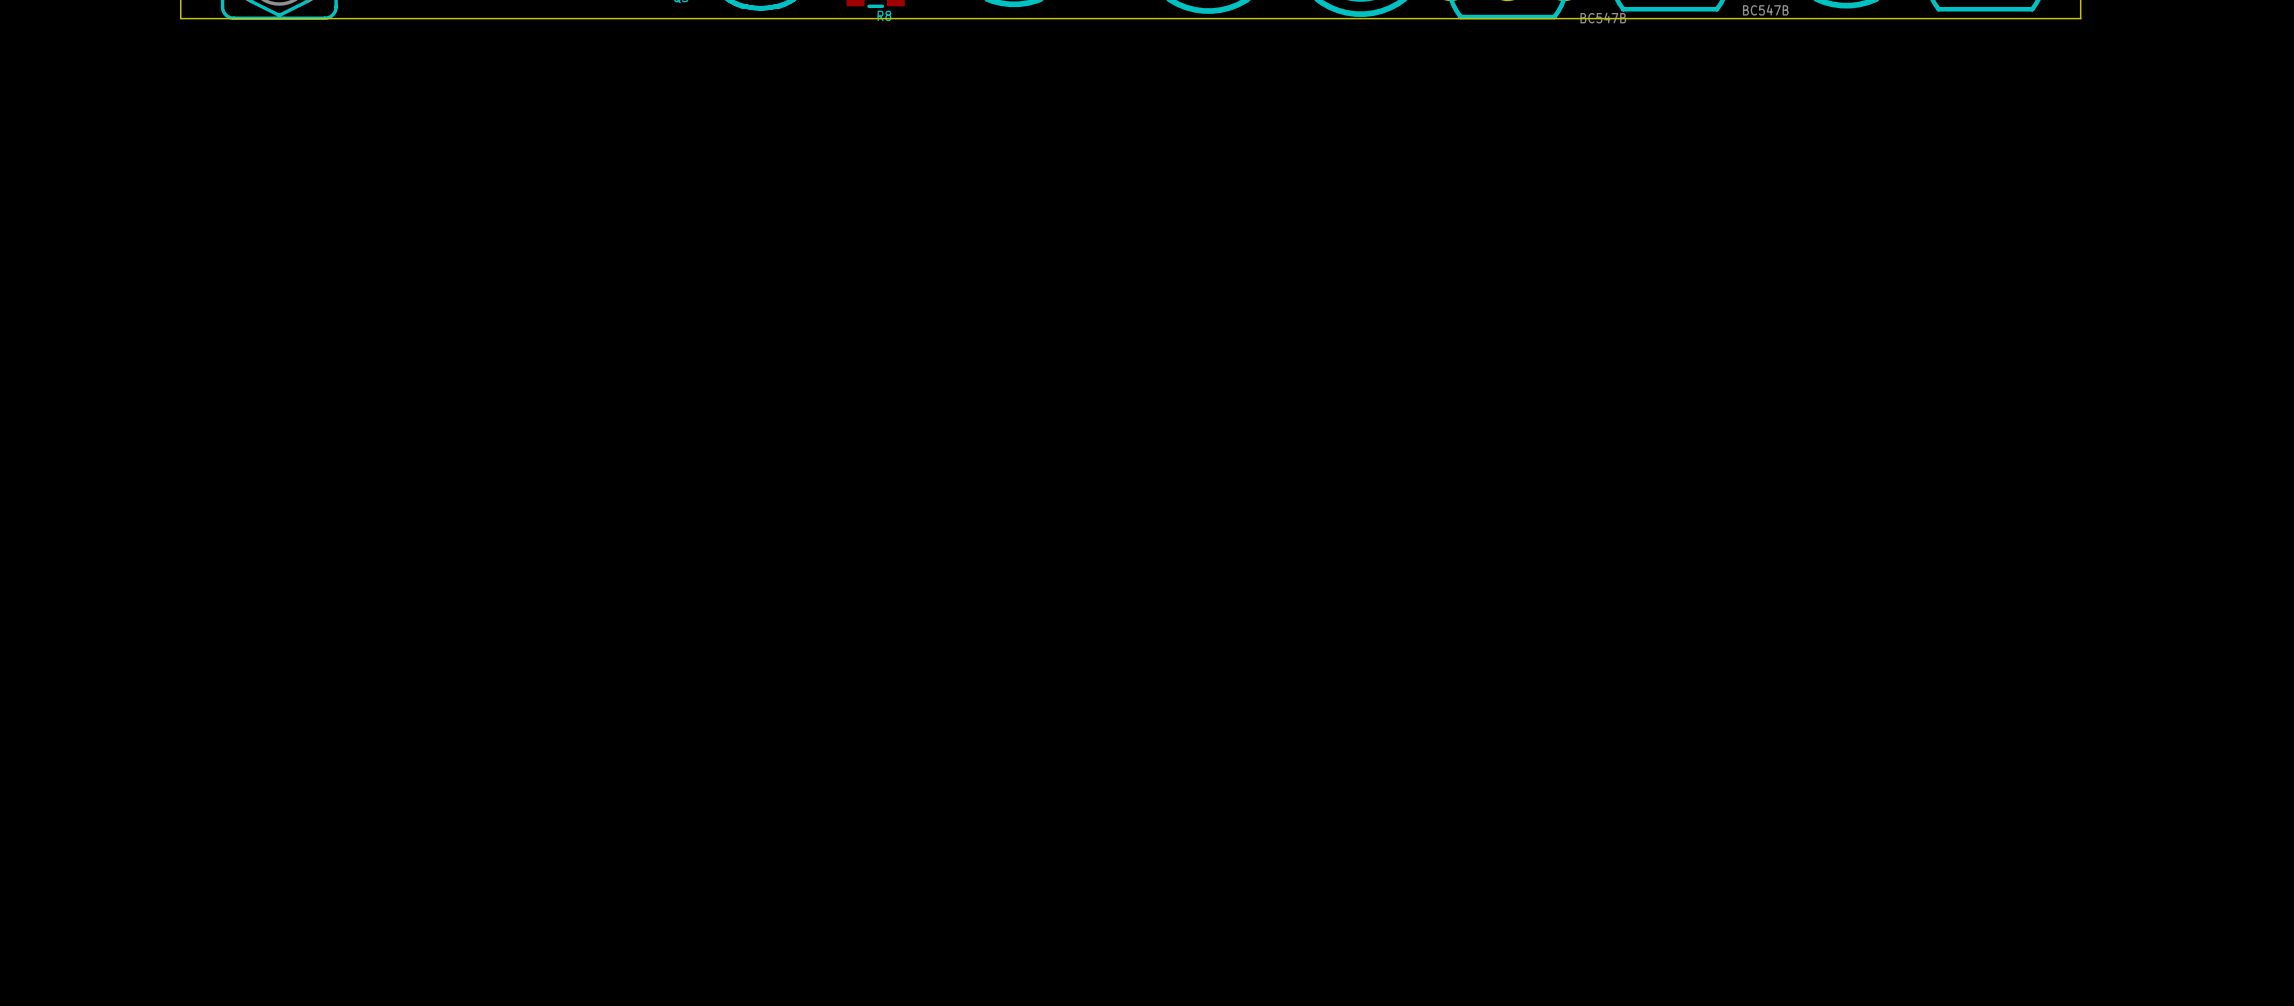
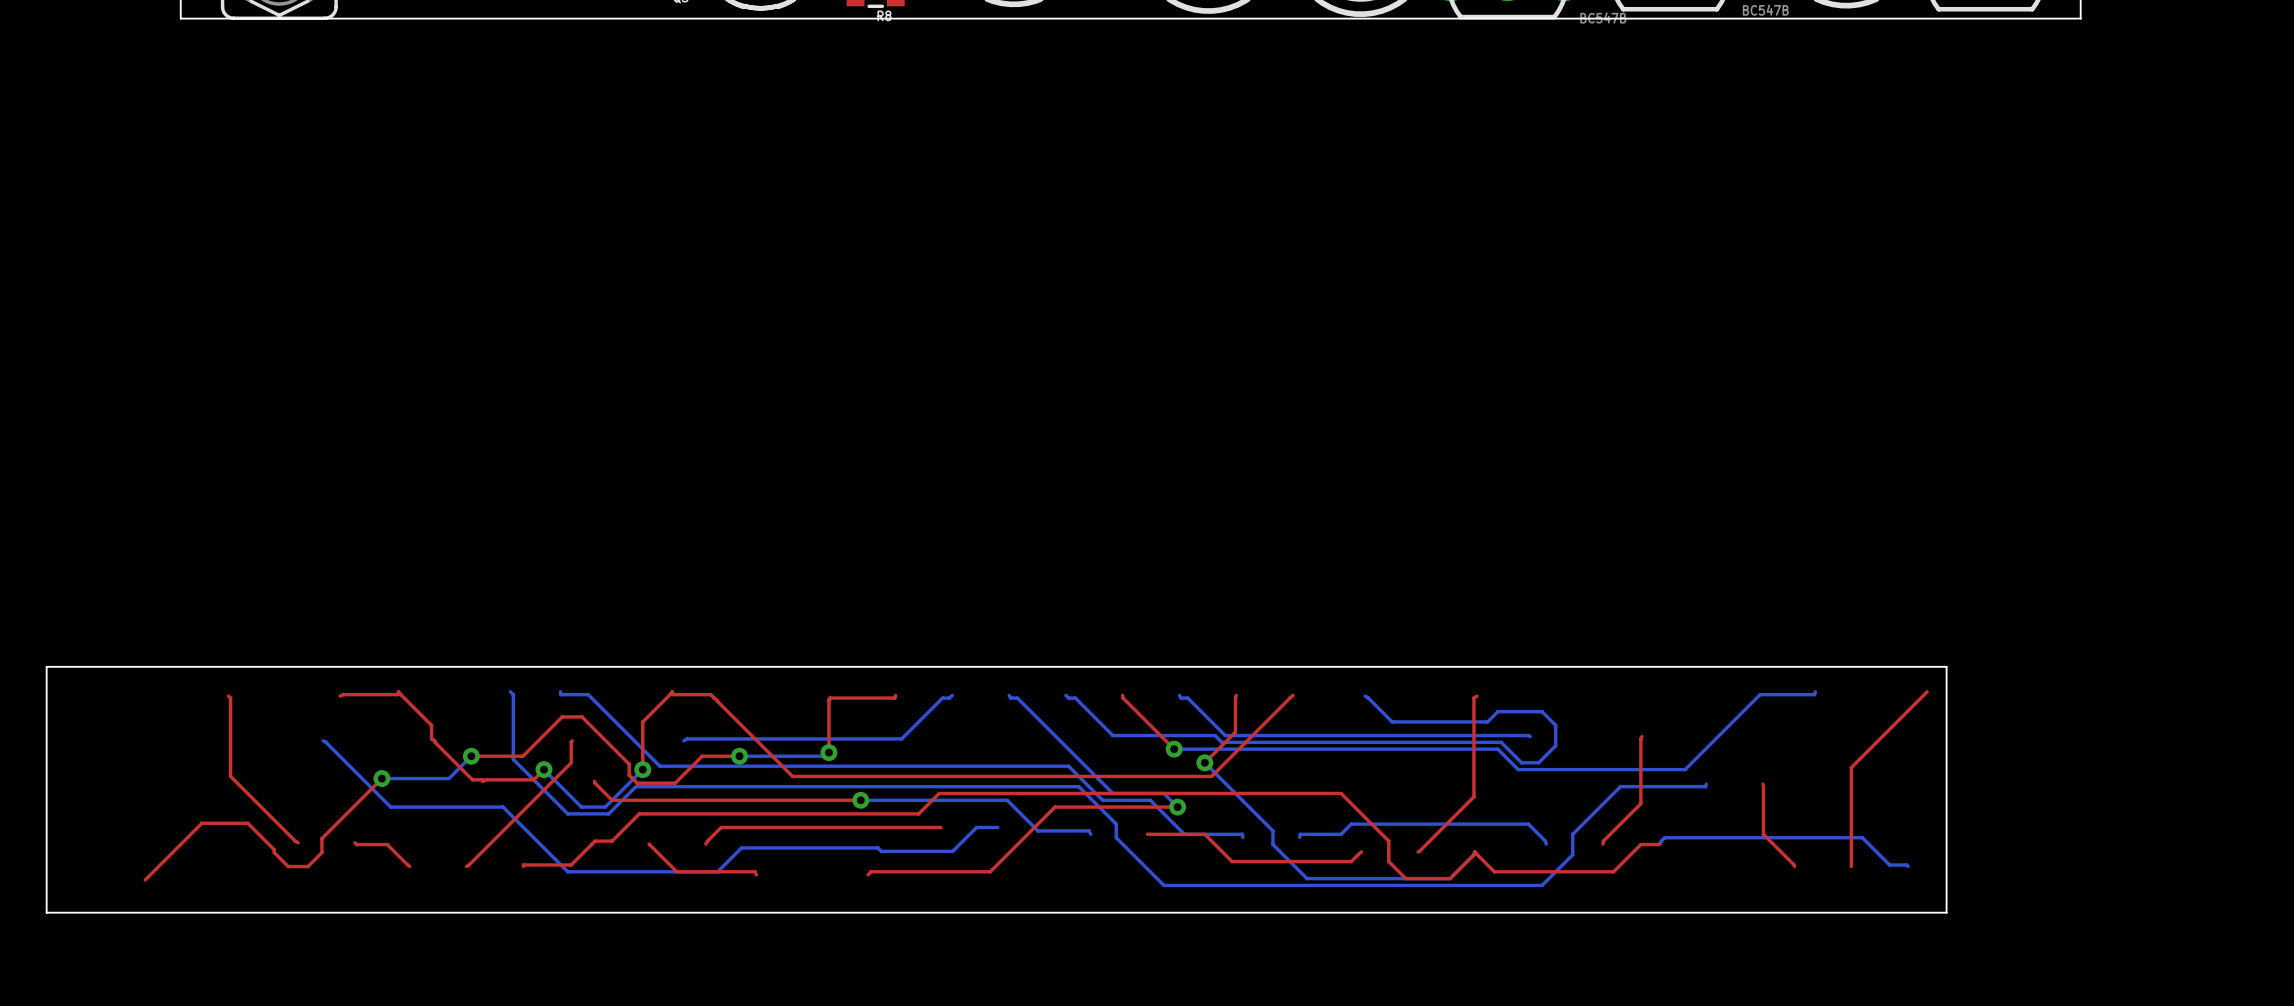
board edge: none -> (46, 666) (1946, 666) (1946, 912) (46, 912) (46, 666)
bottom track: none -> (510, 691) (513, 694) (513, 759) (567, 813) (608, 813) (635, 786) (1078, 786) (1116, 824) (1116, 837) (1163, 885) (1542, 885) (1572, 854) (1572, 834) (1620, 786) (1705, 786) (1706, 784)
bottom track: none -> (560, 691) (561, 694) (588, 694) (659, 766) (1068, 766) (1102, 800) (1150, 800) (1184, 834) (1242, 834) (1242, 837)
bottom track: none -> (1815, 691) (1814, 694) (1760, 694) (1685, 769) (1518, 769) (1497, 749) (1174, 749)
top track: none -> (1927, 691) (1851, 767) (1851, 866)
top track: none -> (895, 695) (894, 698) (830, 698) (828, 700)
bottom track: none -> (952, 695) (949, 698) (942, 698) (901, 738) (687, 738) (683, 740)
bottom track: none -> (1009, 695) (1010, 698) (1017, 698) (1112, 793) (1163, 793) (1177, 807)
bottom track: none -> (1065, 695) (1068, 698) (1075, 698) (1112, 735) (1215, 735) (1221, 742) (1501, 742) (1521, 762) (1538, 762) (1555, 745) (1555, 725) (1542, 711) (1497, 711) (1487, 721) (1392, 721) (1365, 696)
top track: none -> (1122, 695) (1123, 698) (1174, 749)
bottom track: none -> (1179, 695) (1181, 698) (1187, 698) (1225, 735) (1530, 736)
top track: none -> (1236, 695) (1235, 732) (1204, 762)
top track: none -> (1293, 695) (1211, 776) (792, 776) (710, 694) (673, 694) (672, 691) (642, 721) (642, 769)
top track: none -> (228, 696) (230, 698) (230, 776) (298, 842)
top track: none -> (340, 696) (397, 694) (398, 691) (431, 725) (431, 738) (472, 779) (533, 779) (543, 769)
top track: none -> (1476, 696) (1473, 698) (1473, 796) (1418, 851)
top track: none -> (828, 700) (828, 756)
top track: none -> (1641, 736) (1640, 803) (1603, 841) (1603, 844)
bottom track: none -> (323, 740) (390, 807) (503, 807) (567, 871) (717, 871) (741, 847) (877, 847) (881, 851) (952, 851) (976, 827) (997, 827)
top track: none -> (572, 740) (571, 762) (466, 866)
via: none -> (1174, 749)
bottom track: none -> (828, 752) (825, 756) (739, 756)
via: none -> (828, 752)
bottom track: none -> (471, 756) (448, 778) (381, 778)
top track: none -> (471, 756) (523, 756) (562, 716) (582, 716) (629, 764) (629, 775) (637, 783) (675, 783) (702, 756) (739, 756)
via: none -> (471, 756)
via: none -> (739, 756)
bottom track: none -> (1204, 762) (1272, 830) (1272, 844) (1307, 878) (1450, 878) (1474, 851)
via: none -> (1204, 762)
bottom track: none -> (543, 769) (581, 807) (605, 807) (642, 769)
via: none -> (543, 769)
via: none -> (642, 769)
top track: none -> (381, 778) (321, 838) (321, 852) (307, 866) (288, 866) (247, 823) (201, 823) (145, 879)
via: none -> (381, 778)
top track: none -> (594, 781) (612, 800) (860, 800)
top track: none -> (1763, 784) (1763, 834) (1794, 866)
bottom track: none -> (860, 800) (1007, 800) (1037, 830) (1089, 830) (1090, 834)
via: none -> (860, 800)
top track: none -> (1177, 807) (1054, 807) (990, 871) (871, 871) (868, 874)
via: none -> (1177, 807)
top track: none -> (940, 827) (721, 827) (705, 844)
top track: none -> (1147, 834) (1204, 834) (1232, 861) (1351, 861) (1361, 851)
bottom track: none -> (1299, 837) (1300, 834) (1341, 834) (1351, 824) (1528, 824) (1546, 844)
top track: none -> (354, 842) (356, 844) (387, 844) (409, 866)
top track: none -> (649, 844) (676, 871) (755, 871) (756, 874)
bottom track: none -> (1659, 844) (1664, 837) (1862, 837) (1889, 864) (1908, 866)
top track: none -> (1659, 844) (1640, 844) (1613, 871) (1494, 871) (1474, 851) (1450, 878) (1405, 878) (1388, 861) (1388, 841) (1341, 793) (939, 793) (918, 813) (639, 813) (612, 841) (595, 841) (571, 864) (523, 866)

